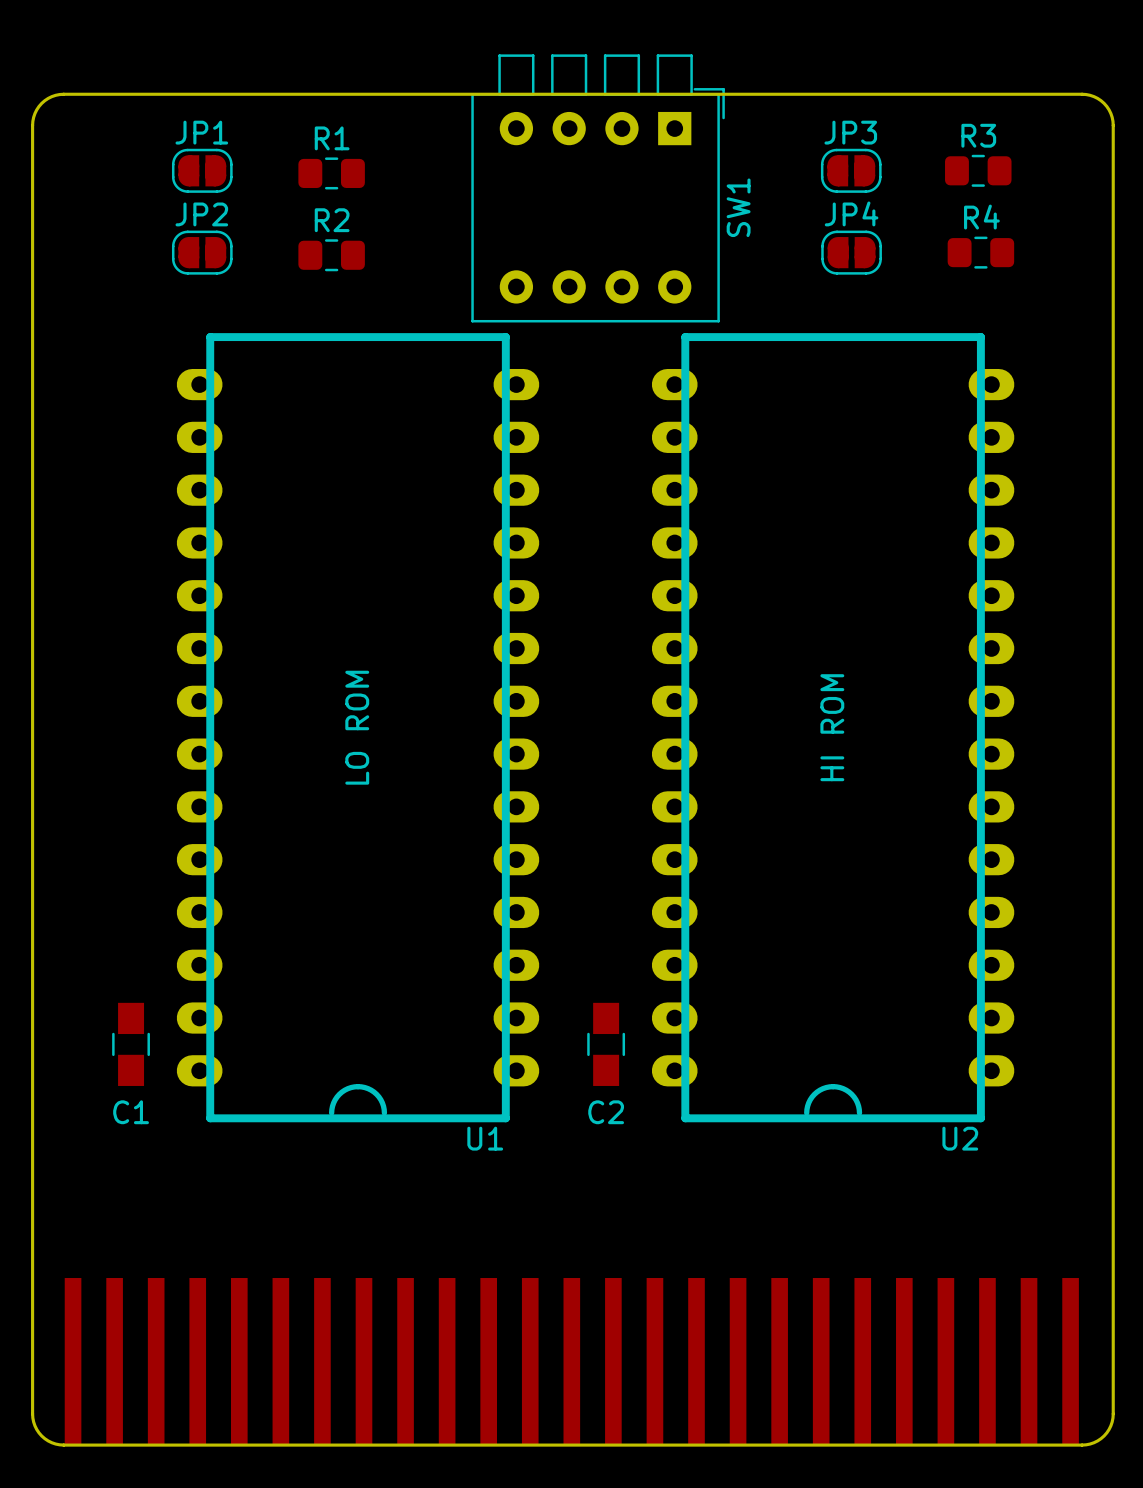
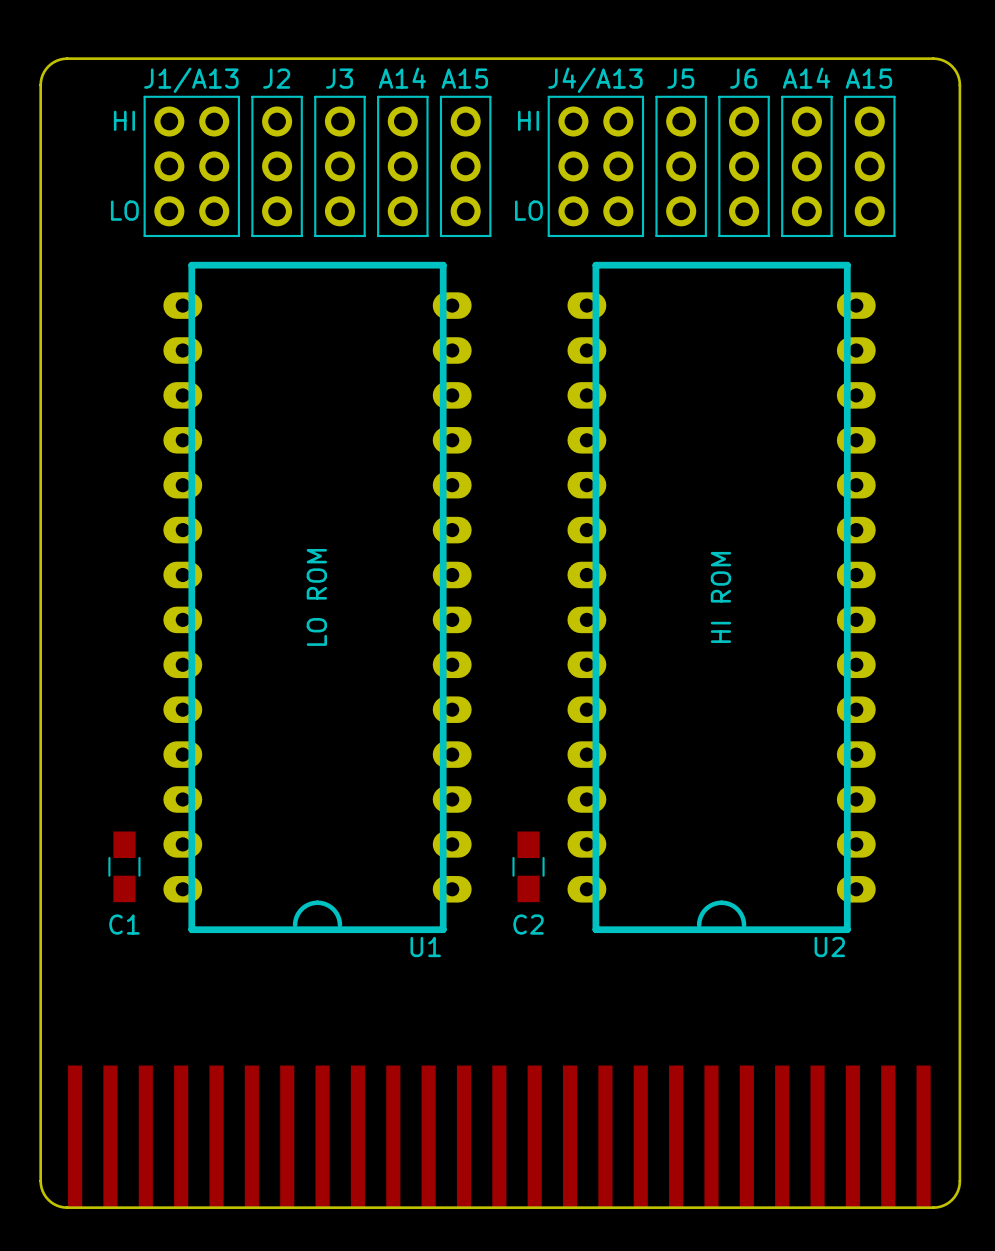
text: none -> A14 (402, 78)
text: none -> A15 (464, 78)
text: none -> A14 (806, 78)
text: none -> A15 (868, 78)
text: none -> J1/A13 (191, 80)
text: none -> J4/A13 (595, 80)
text: none -> HI (124, 120)
text: none -> HI (528, 120)
JP1: (202, 170) -> none
JP3: (851, 170) -> none
R3: (978, 170) -> none
R1: (331, 173) -> none
SW1: (598, 188) -> none
part: none -> (191, 166)
J2: none -> (277, 166)
J3: none -> (339, 166)
part: none -> (402, 166)
part: none -> (465, 166)
part: none -> (595, 166)
J5: none -> (681, 166)
J6: none -> (744, 166)
part: none -> (806, 166)
part: none -> (869, 166)
JP2: (202, 252) -> none
JP4: (851, 252) -> none
R4: (980, 252) -> none
R2: (331, 255) -> none
text: none -> LO (124, 210)
text: none -> LO (528, 210)

